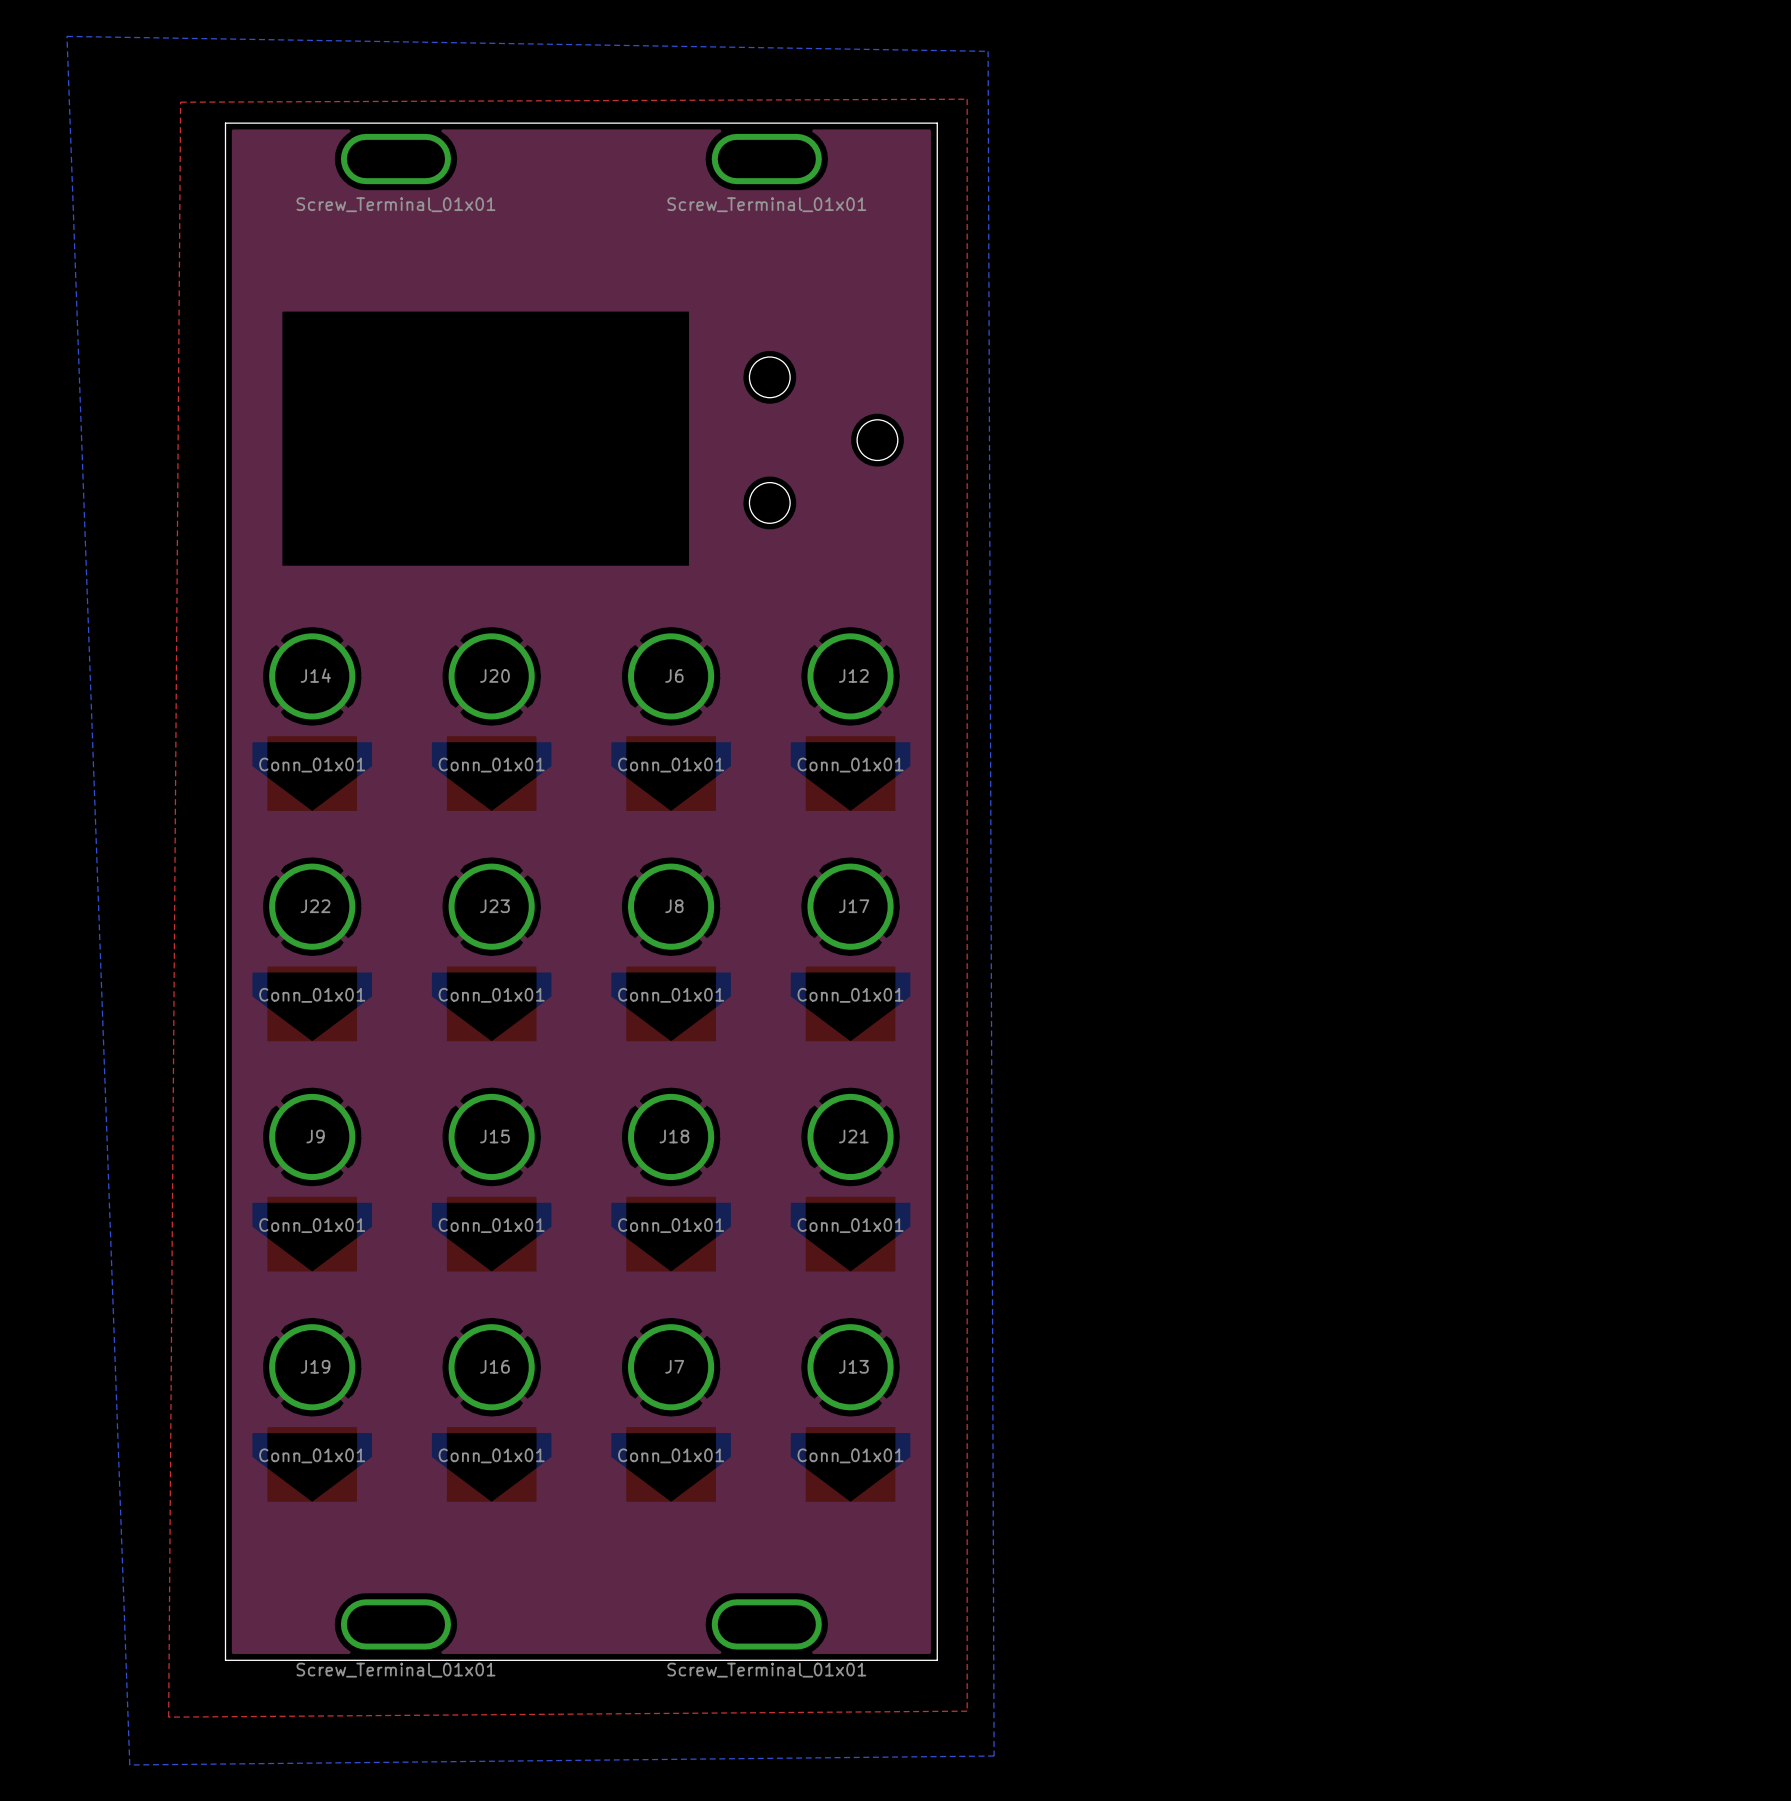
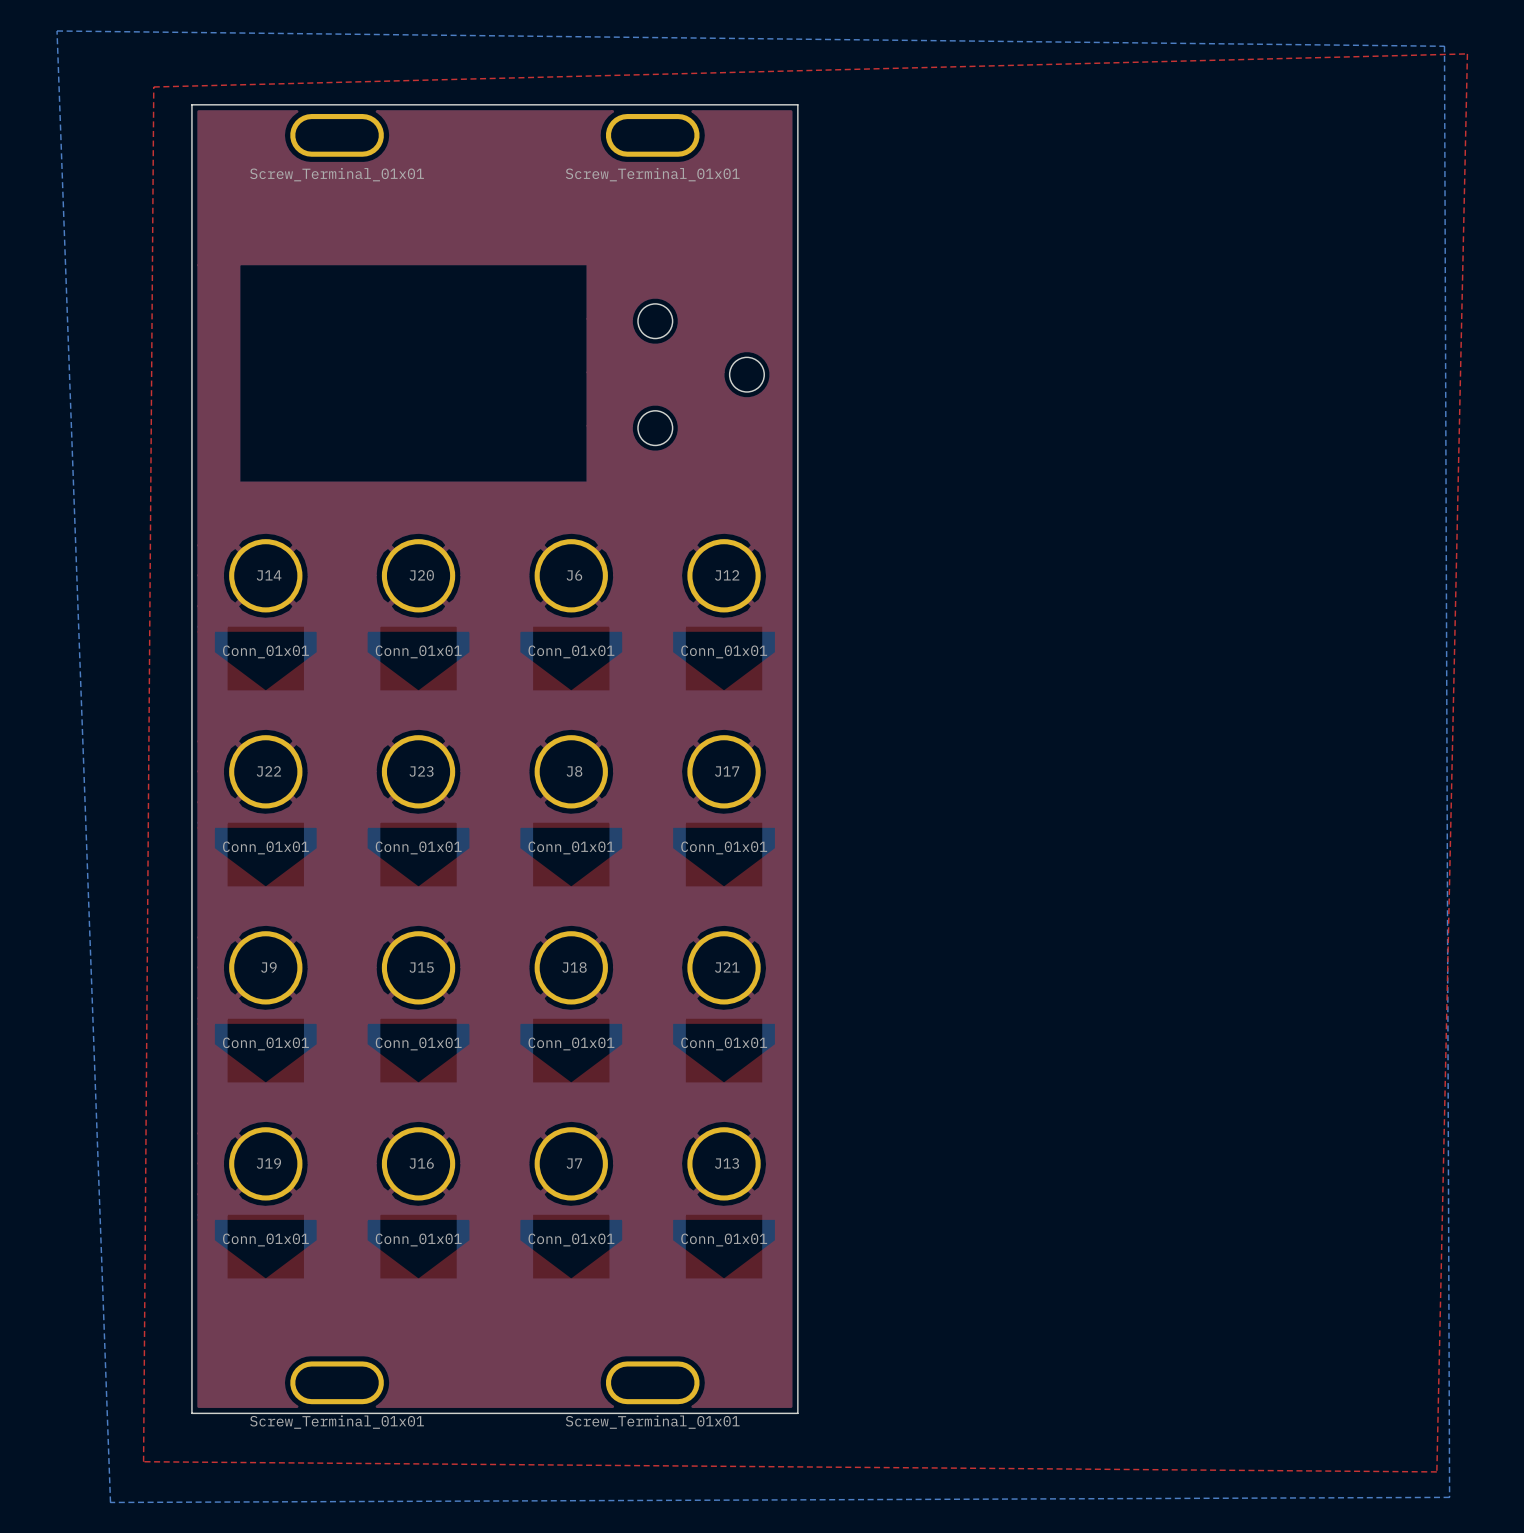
bottom zone outline: (66, 36) (988, 51) (994, 1756) (129, 1765) -> (57, 30) (1444, 46) (1449, 1497) (110, 1502)
top zone outline: (180, 102) (967, 99) (967, 1711) (168, 1717) -> (153, 87) (1467, 53) (1436, 1471) (143, 1461)

